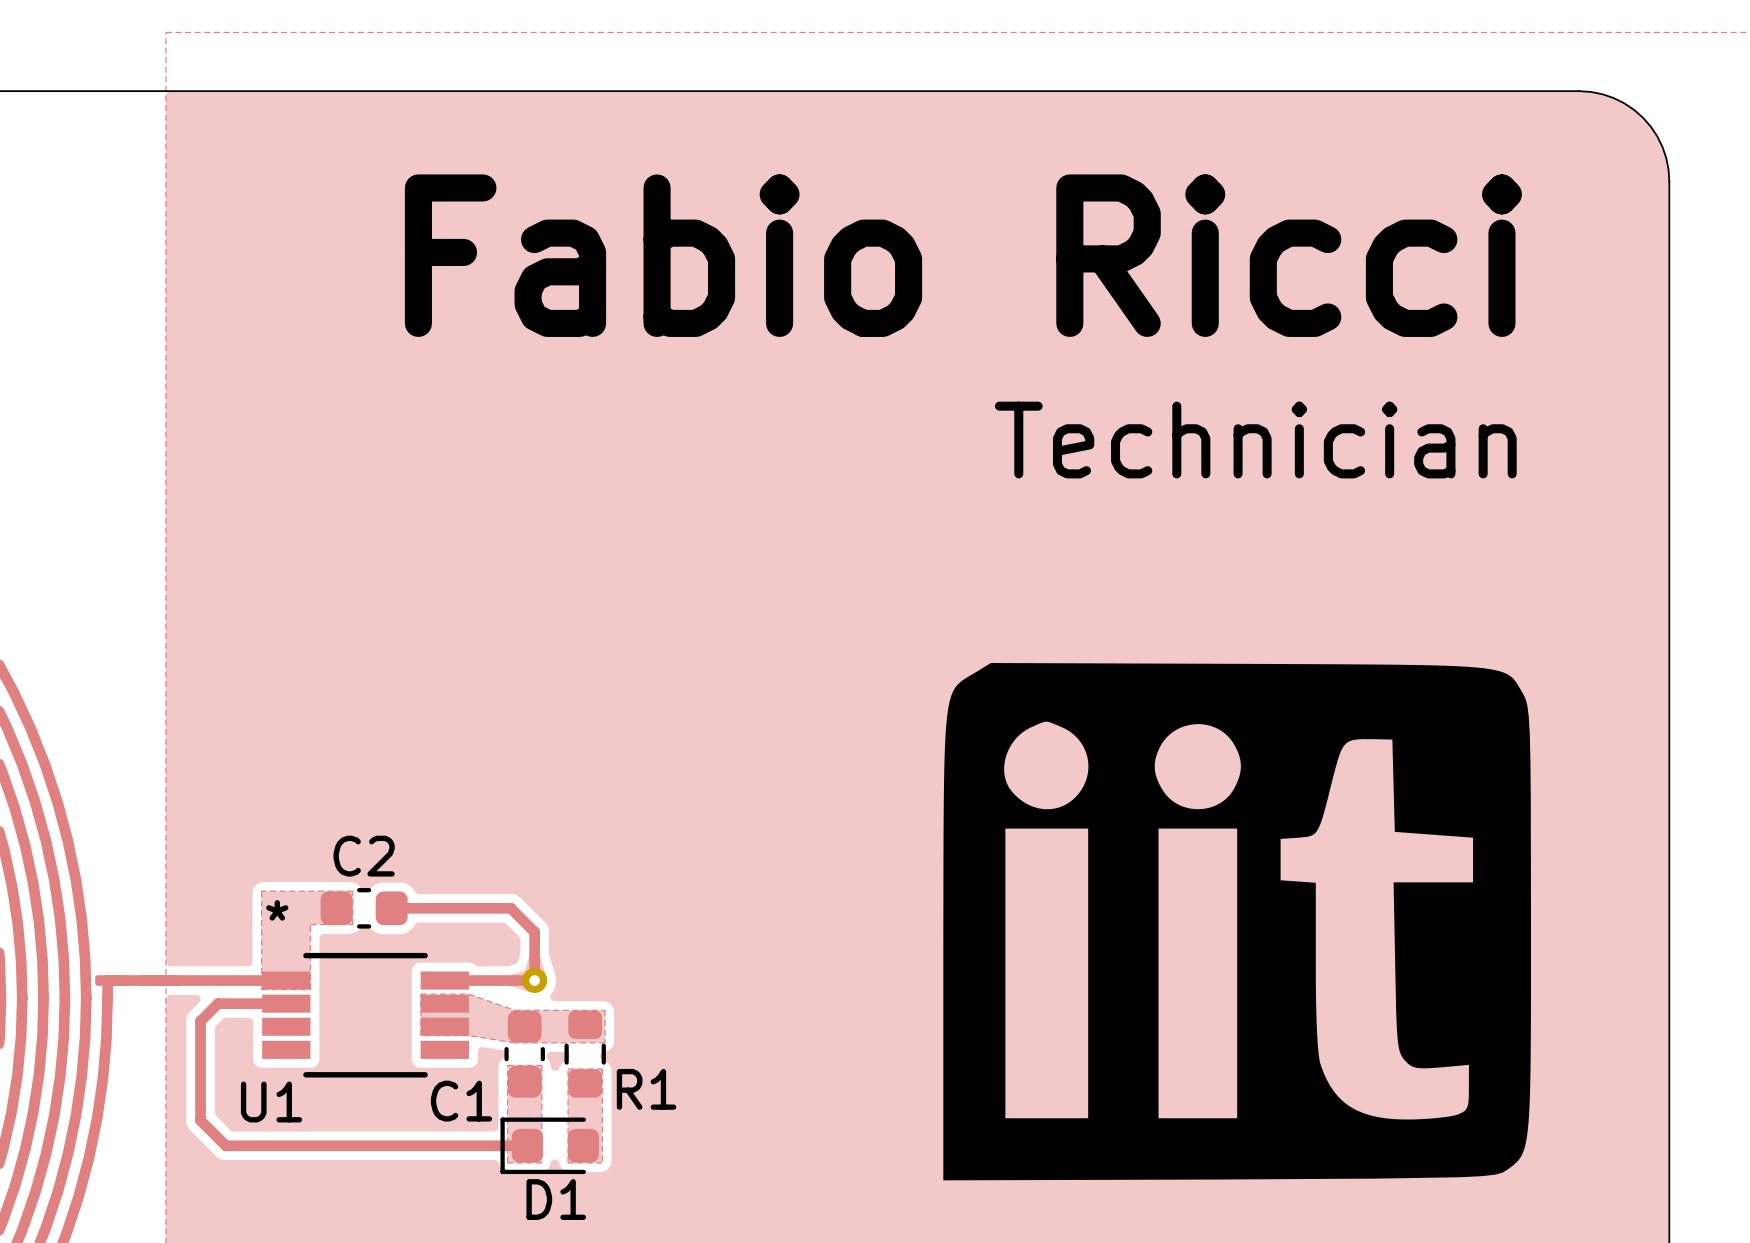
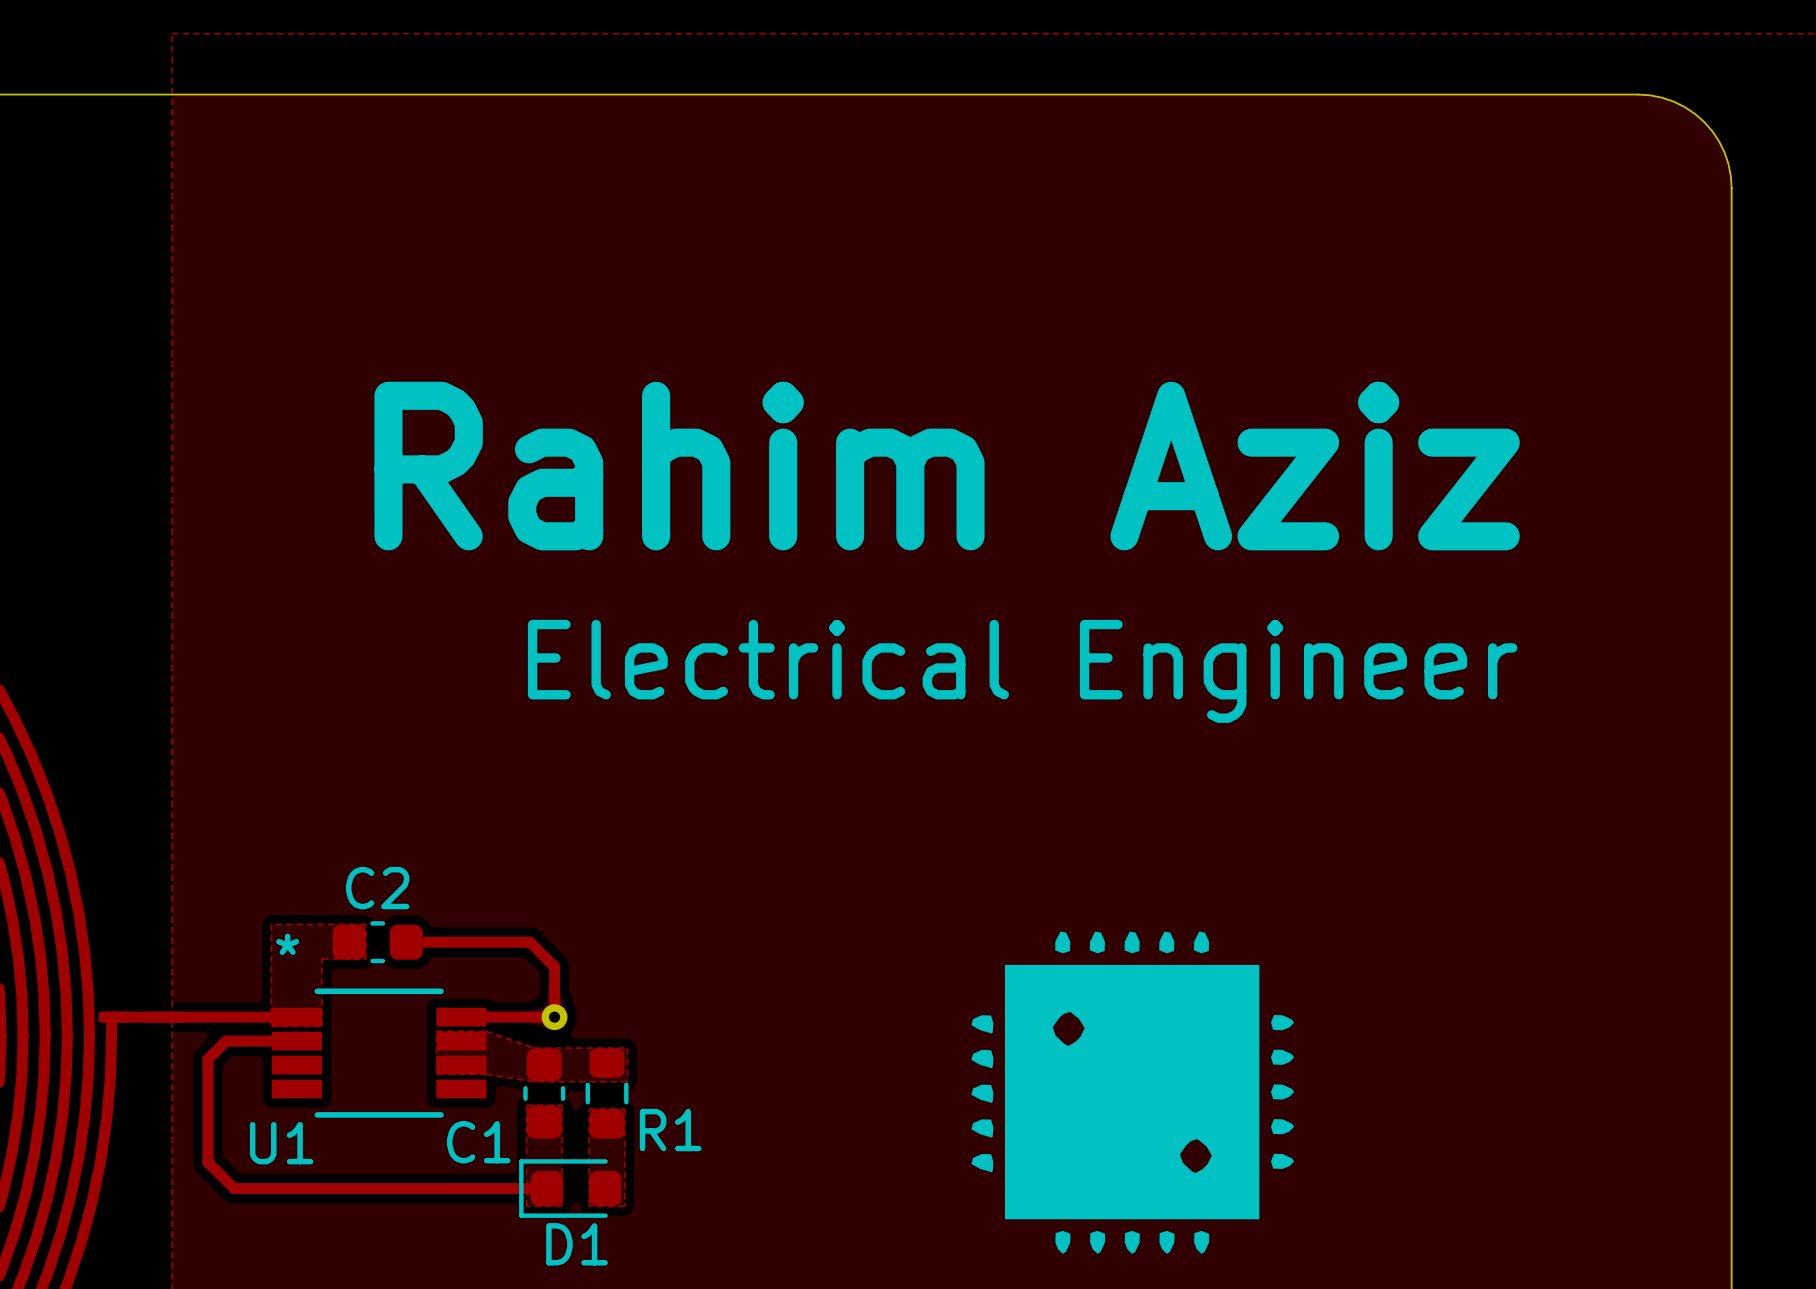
text: Fabio Ricci (963, 255) -> none
text: Technician (1255, 440) -> none
text: none -> Rahim Aziz (947, 466)
text: none -> Electrical Engineer (1022, 671)
drawing: [943, 663, 1531, 1181] -> none
drawing: none -> [971, 931, 1295, 1254]

